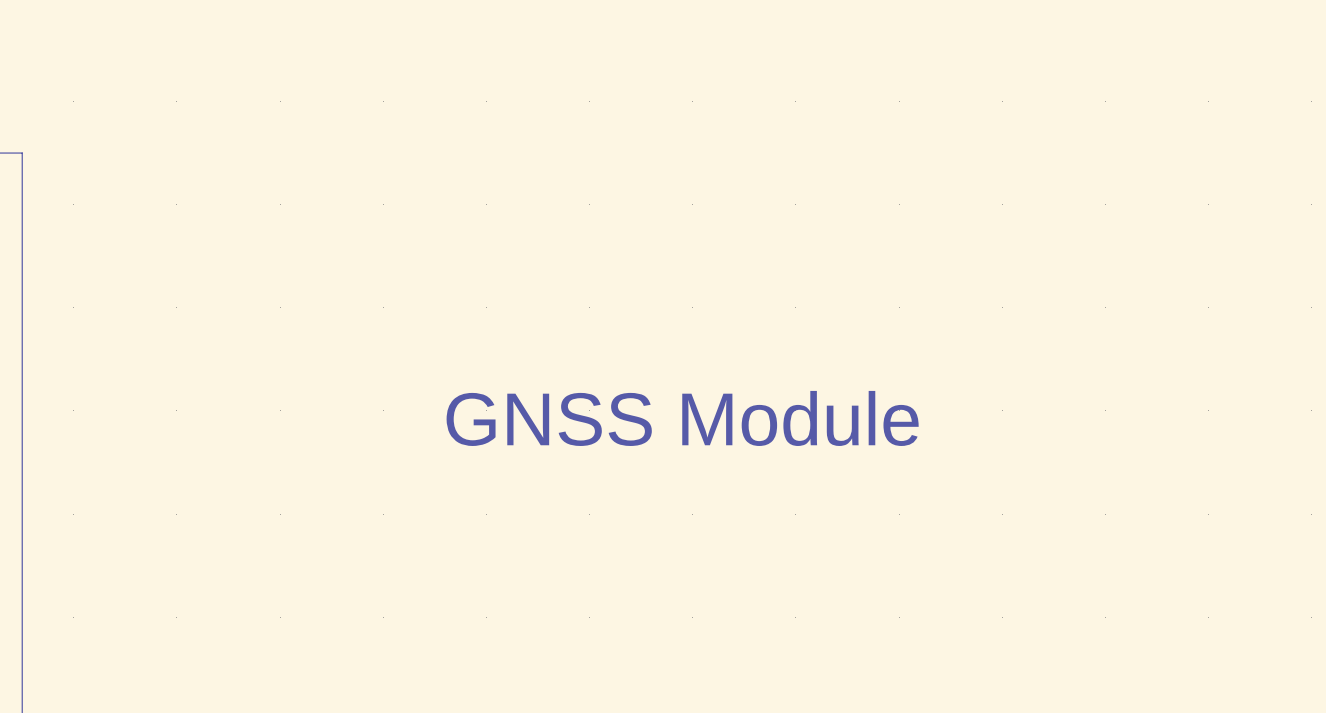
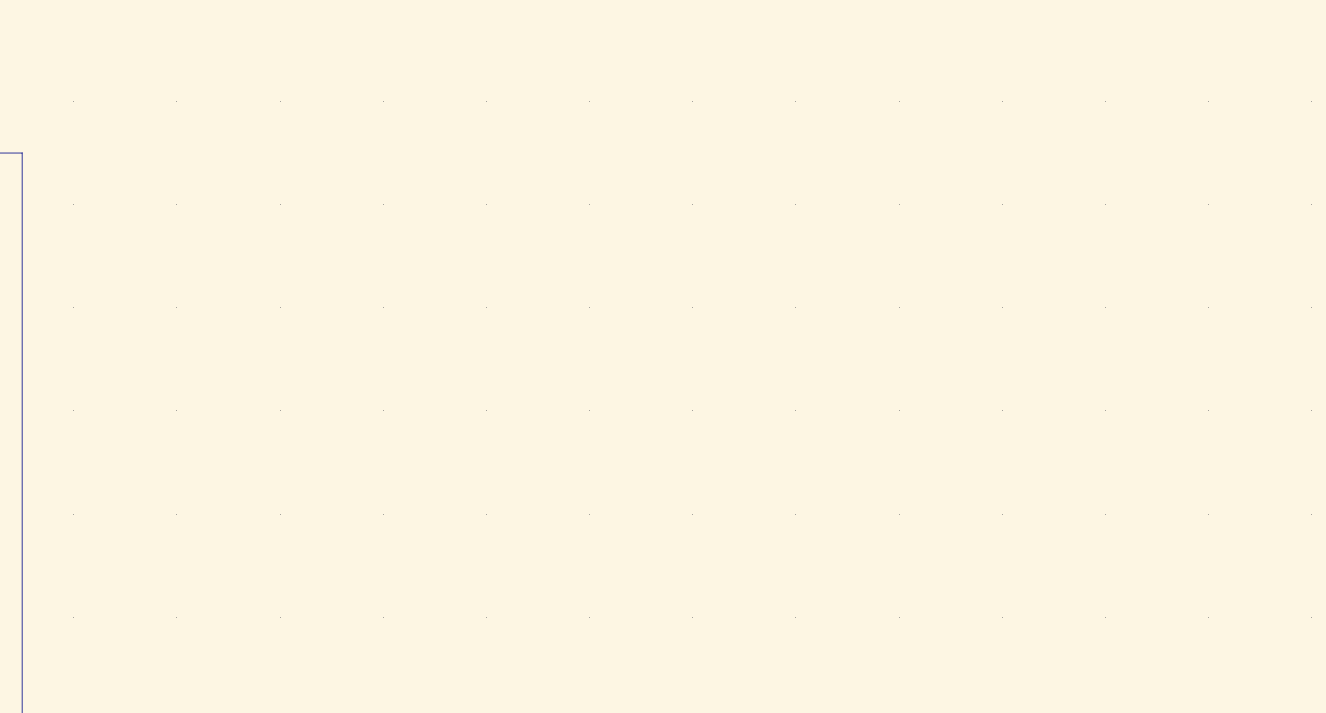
text: GNSS Module (682, 418) -> none

